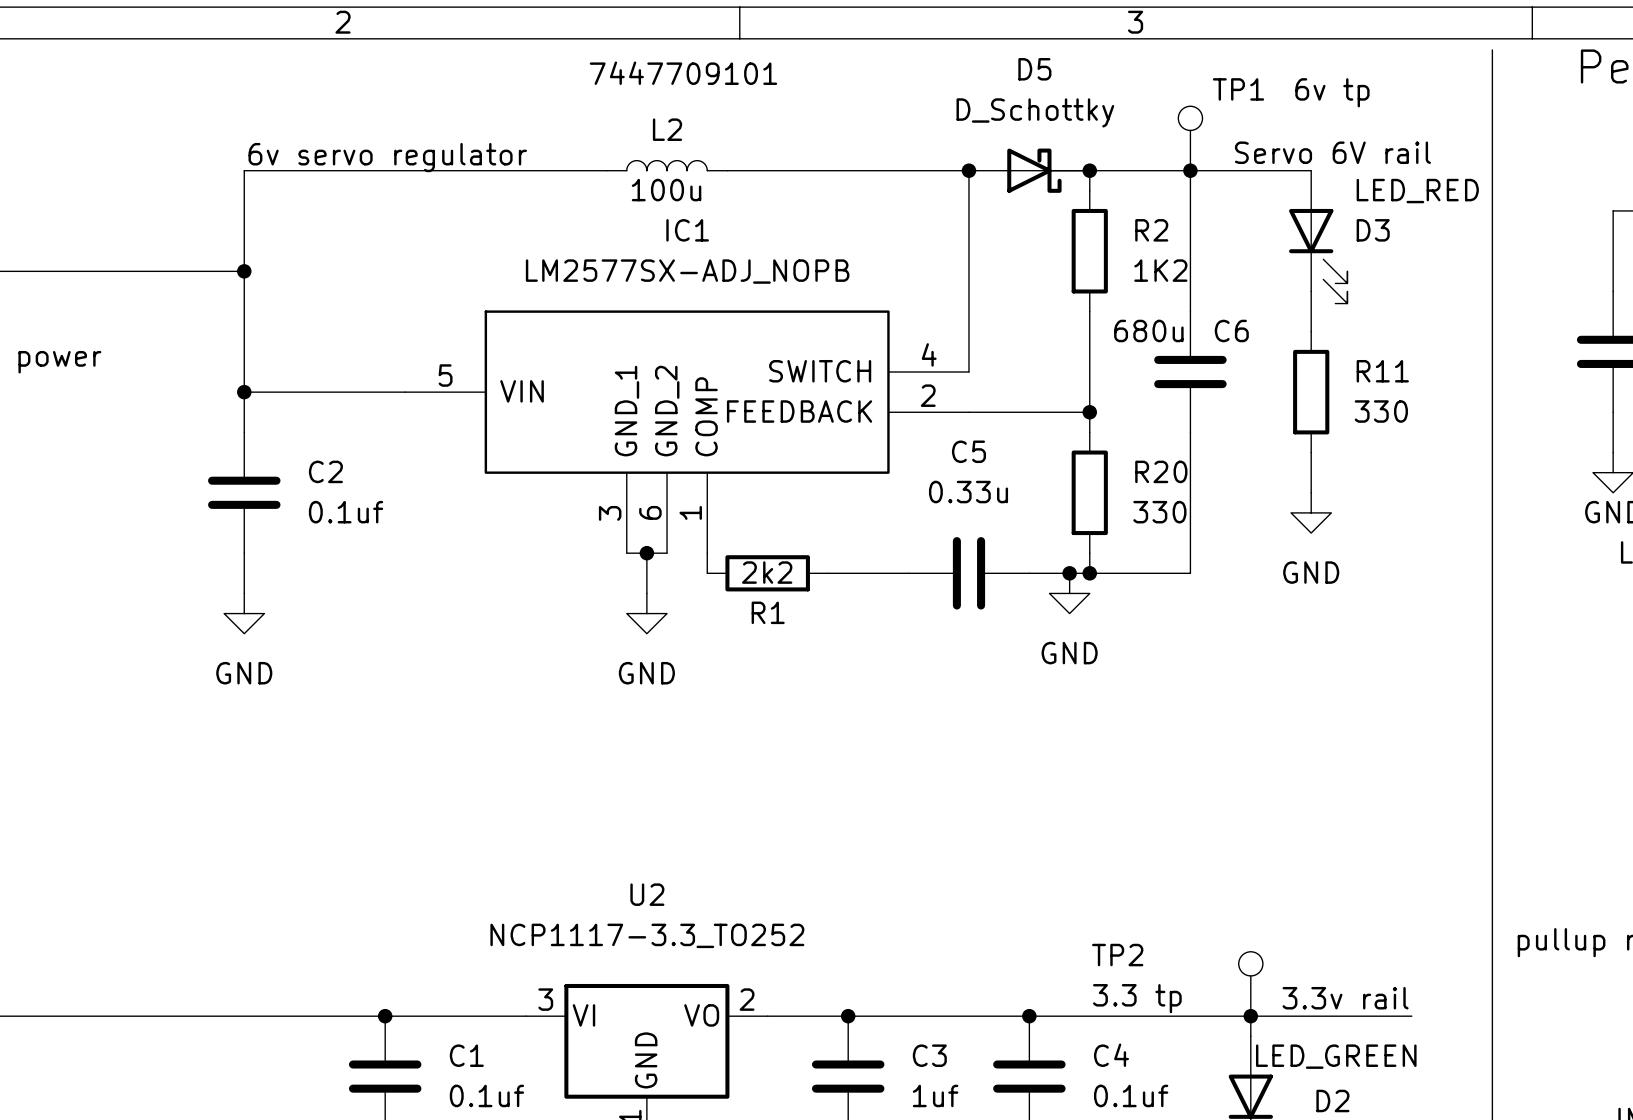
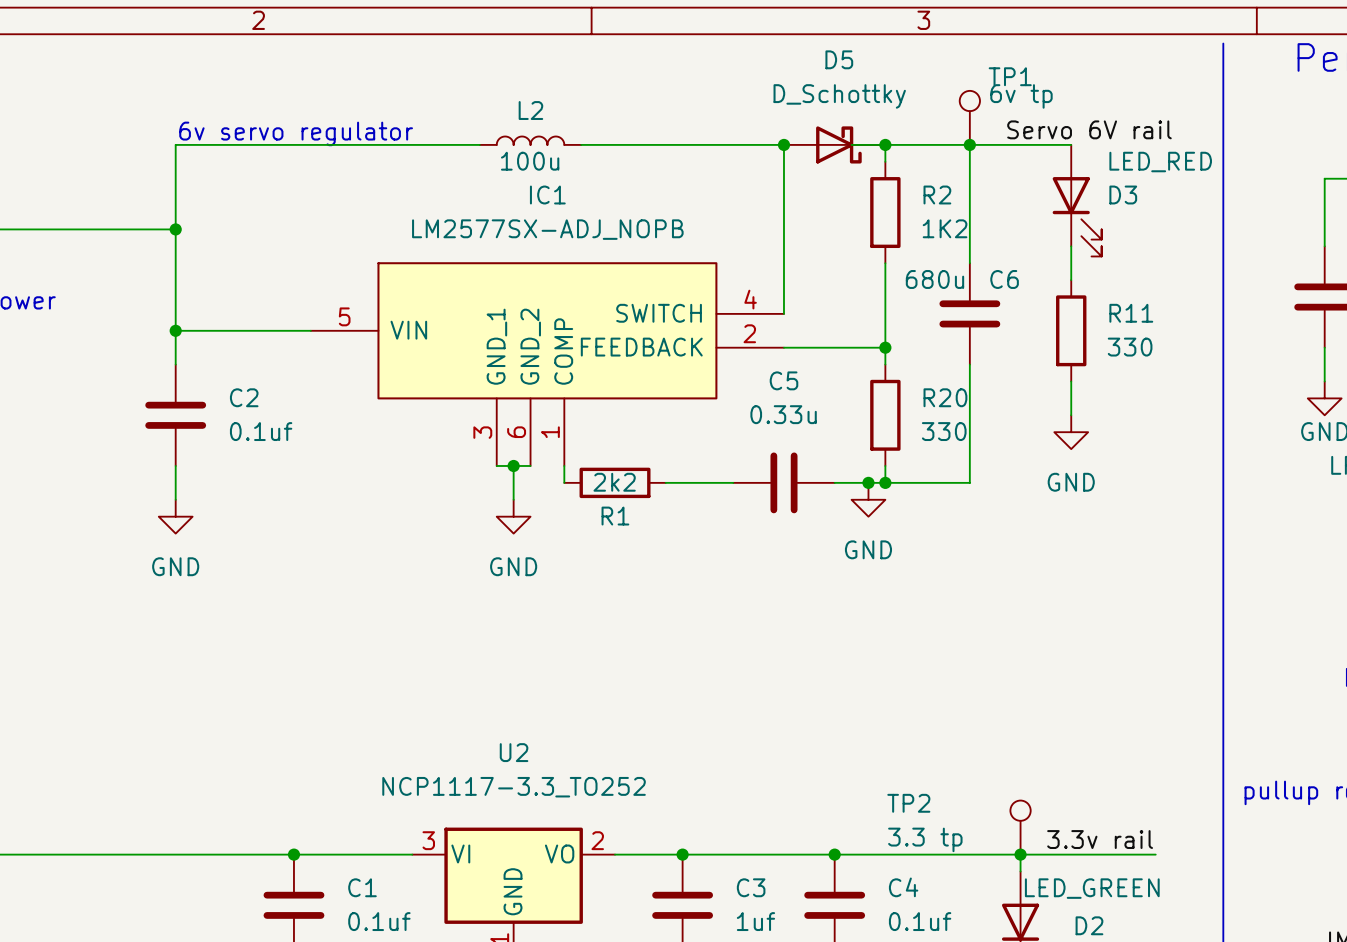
text: 7447709101 (683, 73) -> none
TP1 value position: 6v tp (1332, 92) -> 6v tp (1021, 96)

